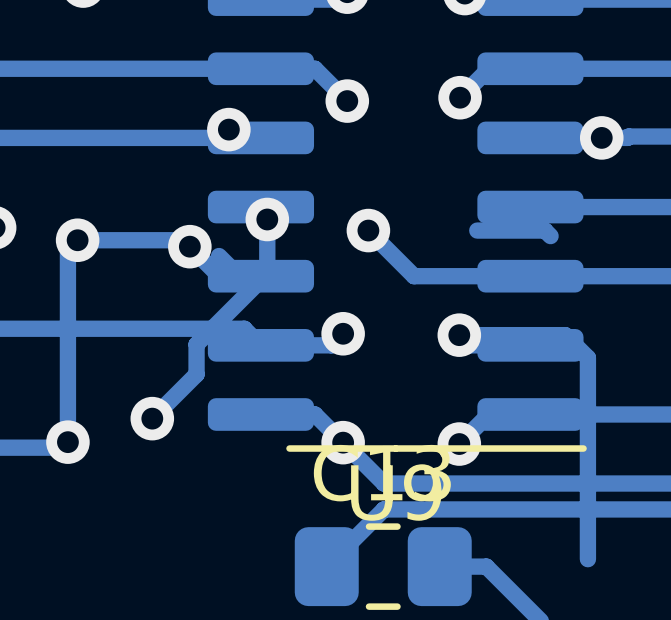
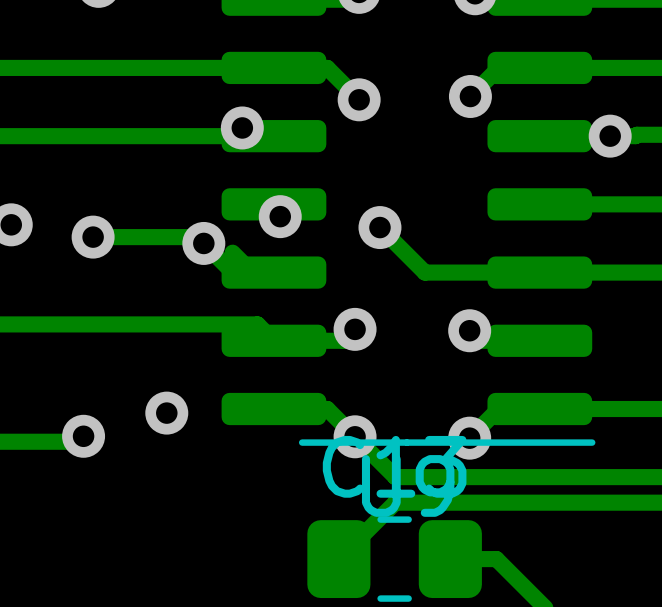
track: (267, 219) (267, 273) (196, 344) (196, 374) (152, 418) -> none
track: (477, 230) (545, 230) (550, 236) -> none
track: (77, 240) (67, 249) (67, 442) -> none
track: (459, 335) (565, 335) (587, 357) (587, 559) -> none

